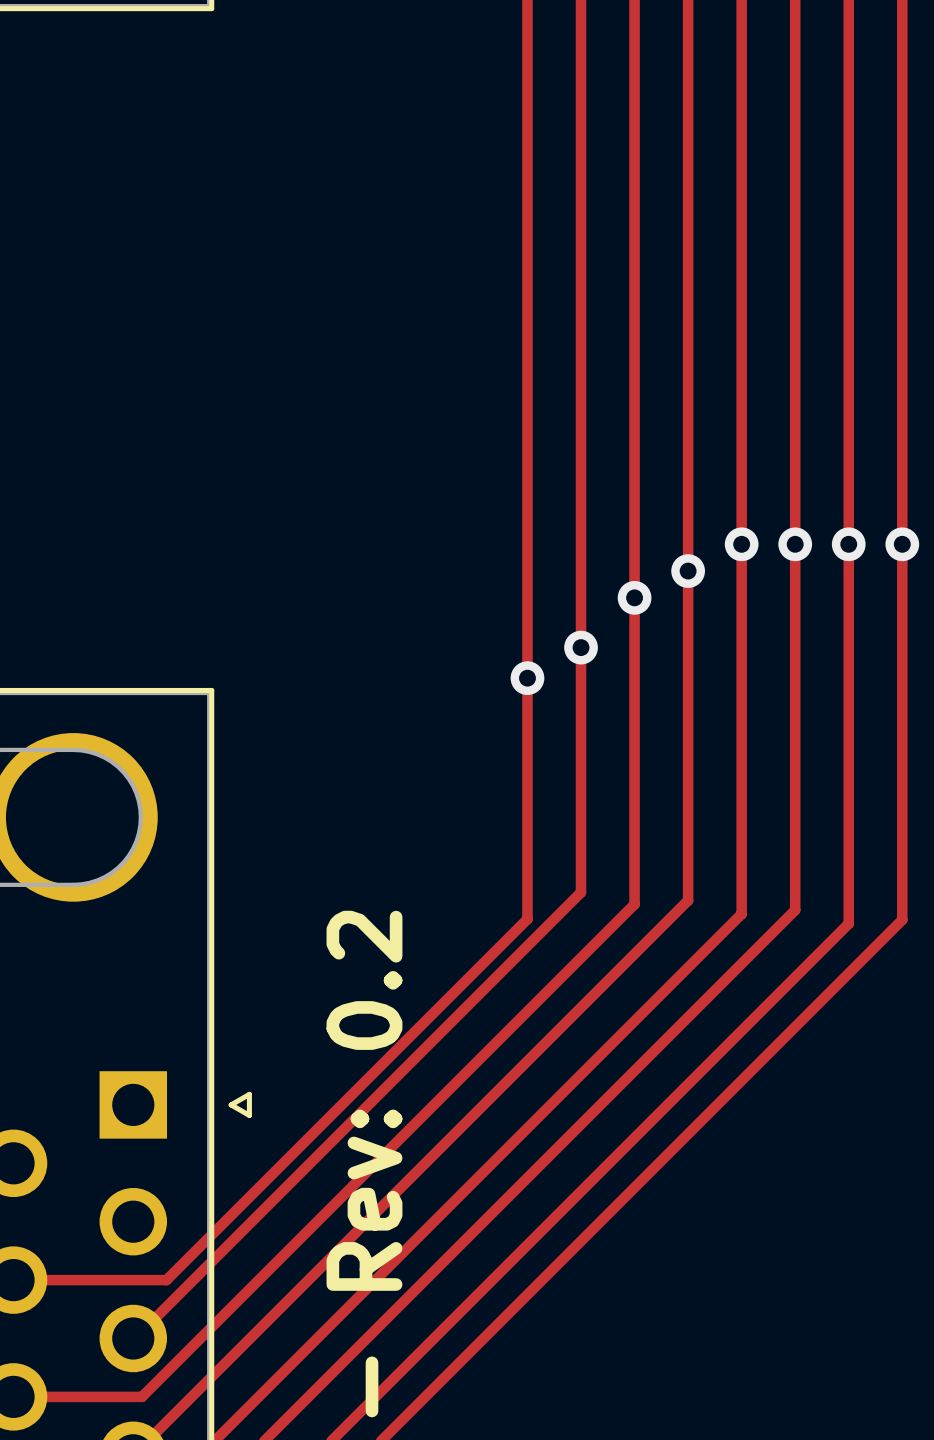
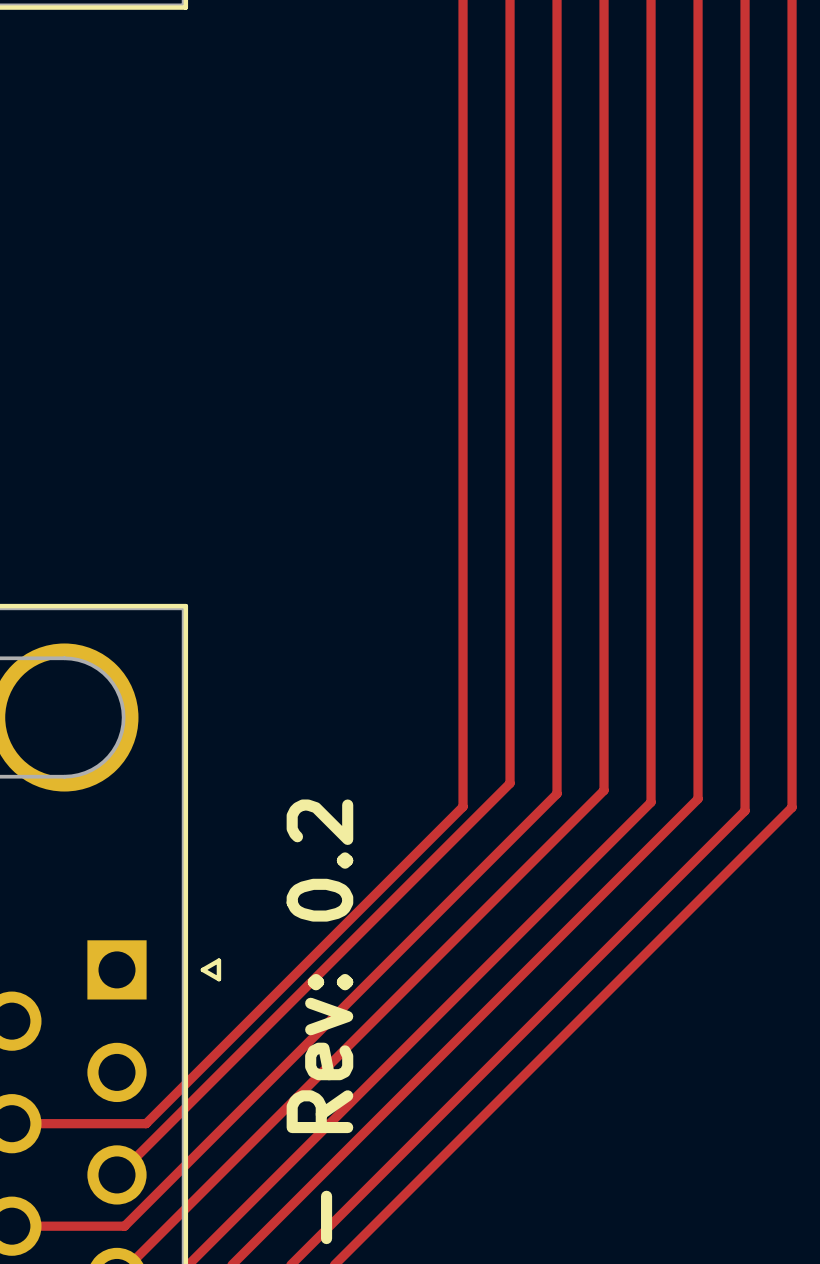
via: (741, 544) -> none
via: (795, 544) -> none
via: (848, 544) -> none
via: (902, 544) -> none
via: (688, 571) -> none
via: (634, 597) -> none
via: (581, 647) -> none
via: (527, 678) -> none

